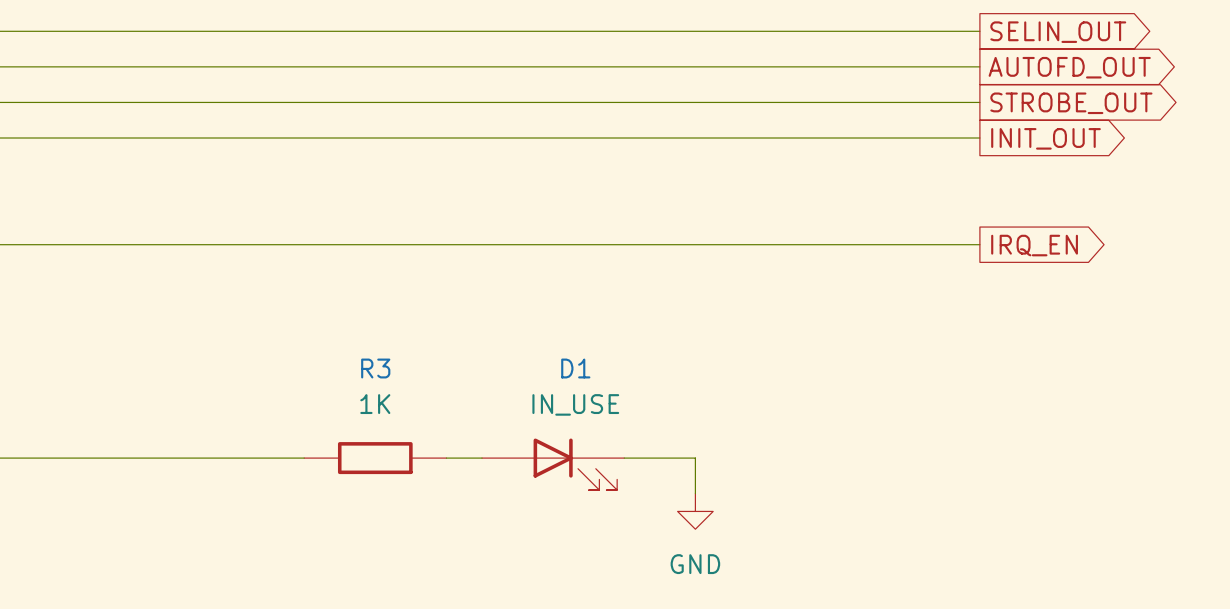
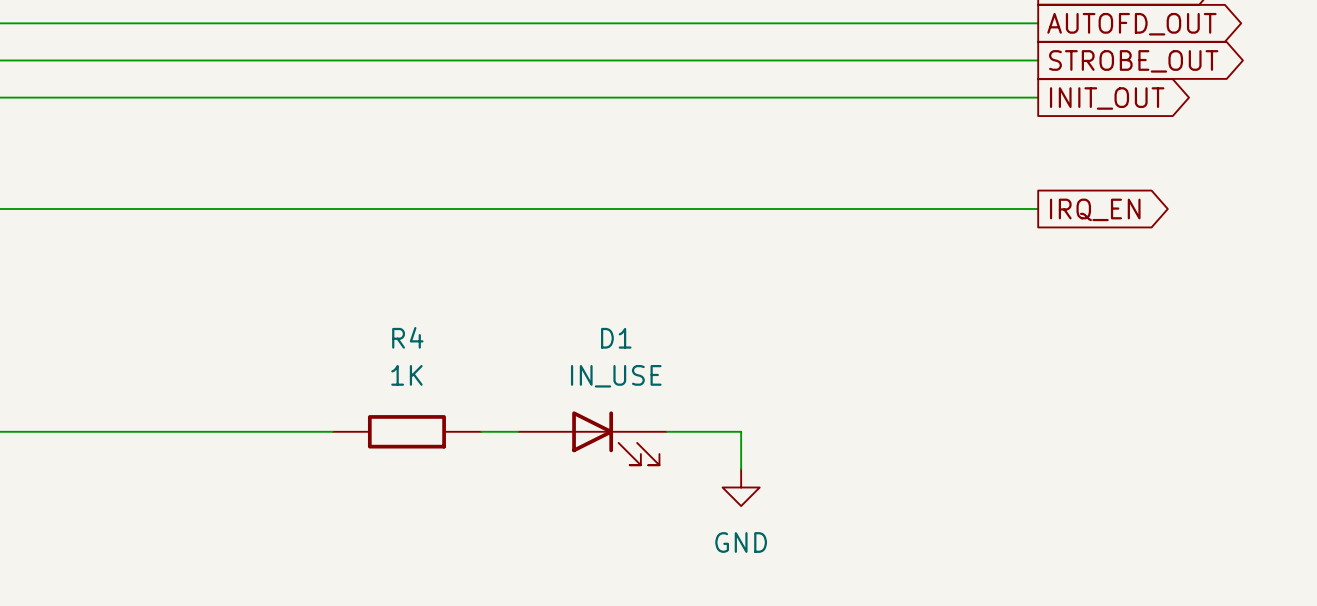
R3 name: R3 (375, 368) -> R4 (407, 337)

